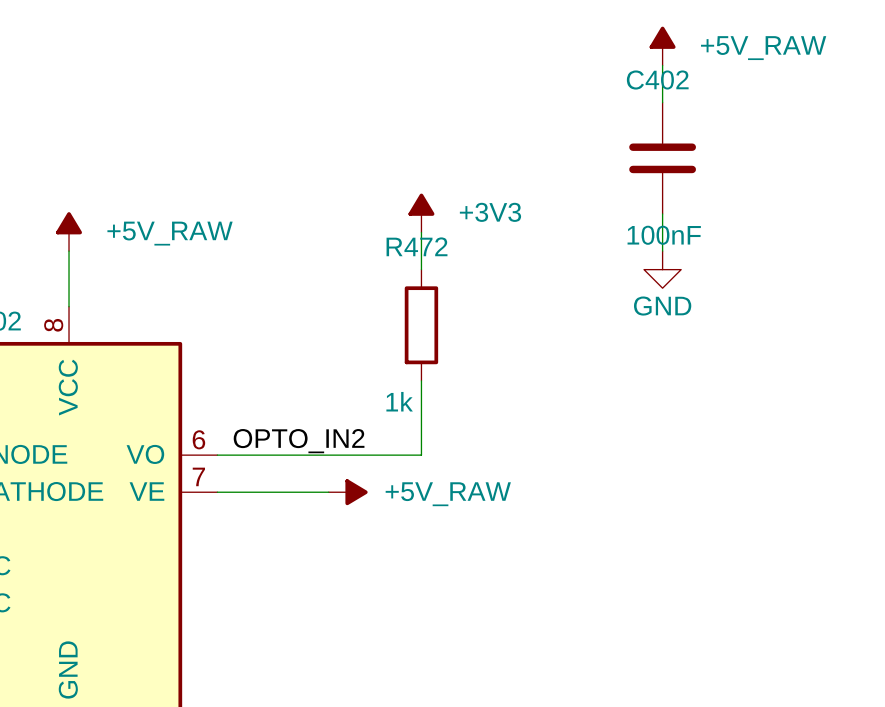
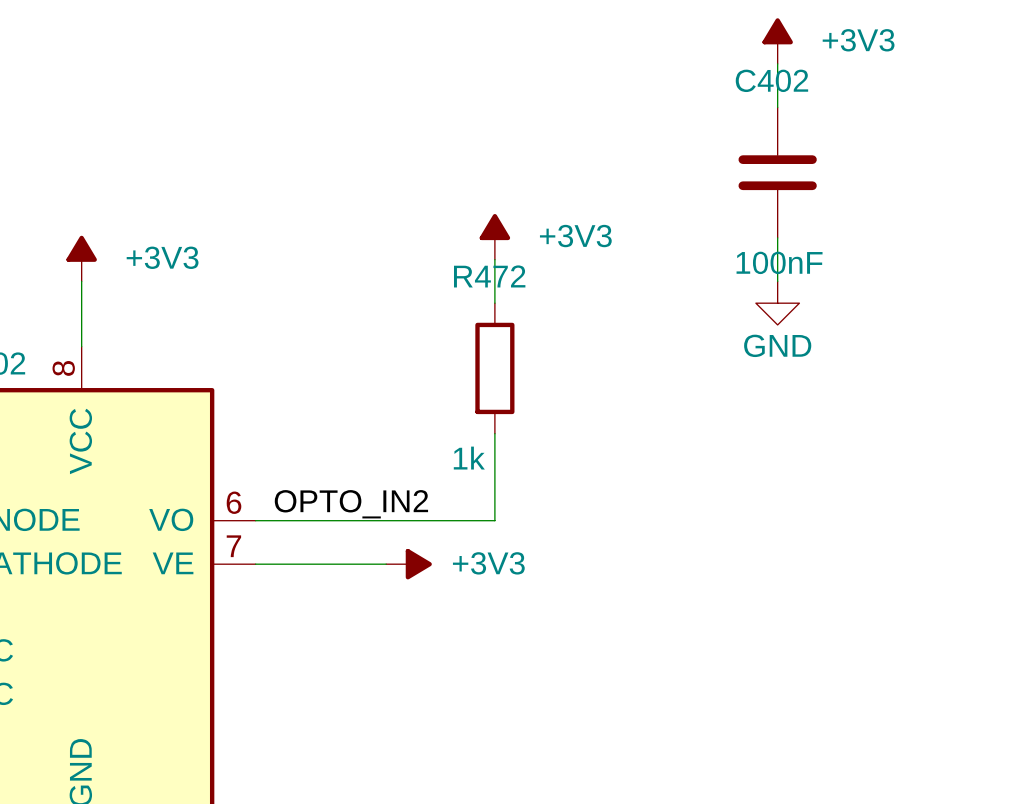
power symbol: +5V_RAW (662, 46) -> +3V3 (777, 41)
power symbol: +5V_RAW (69, 231) -> +3V3 (81, 258)
power symbol: +5V_RAW (348, 492) -> +3V3 (408, 564)

